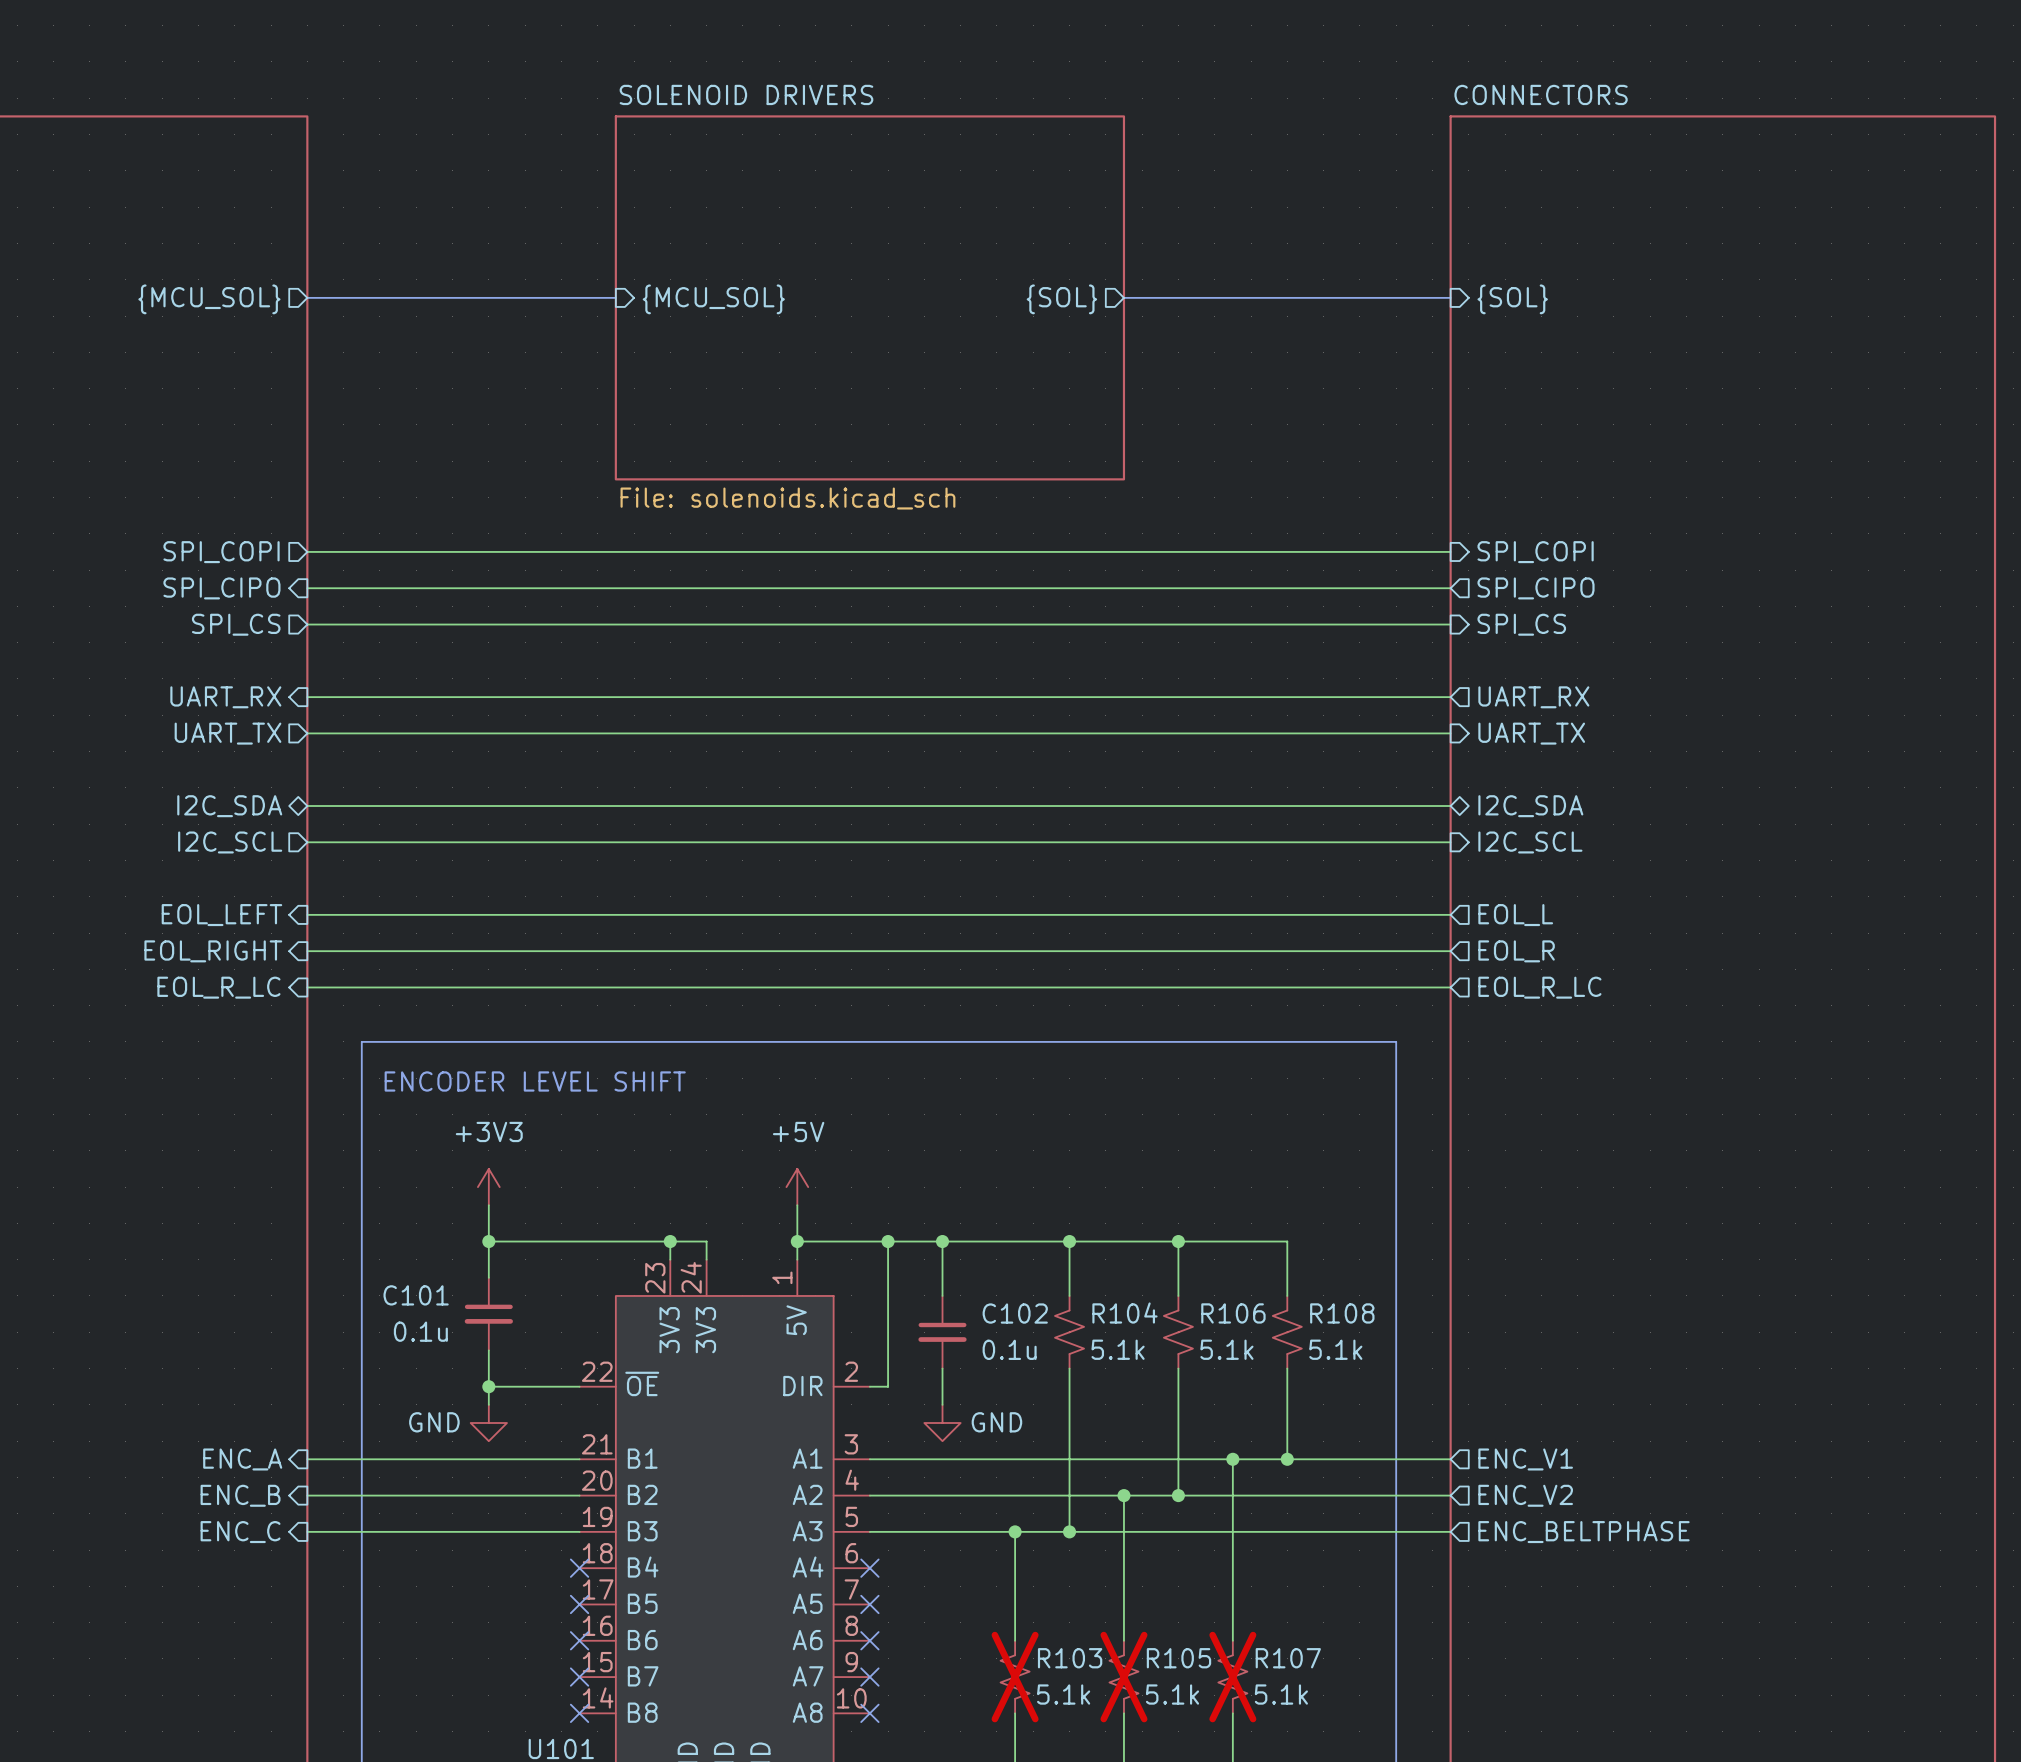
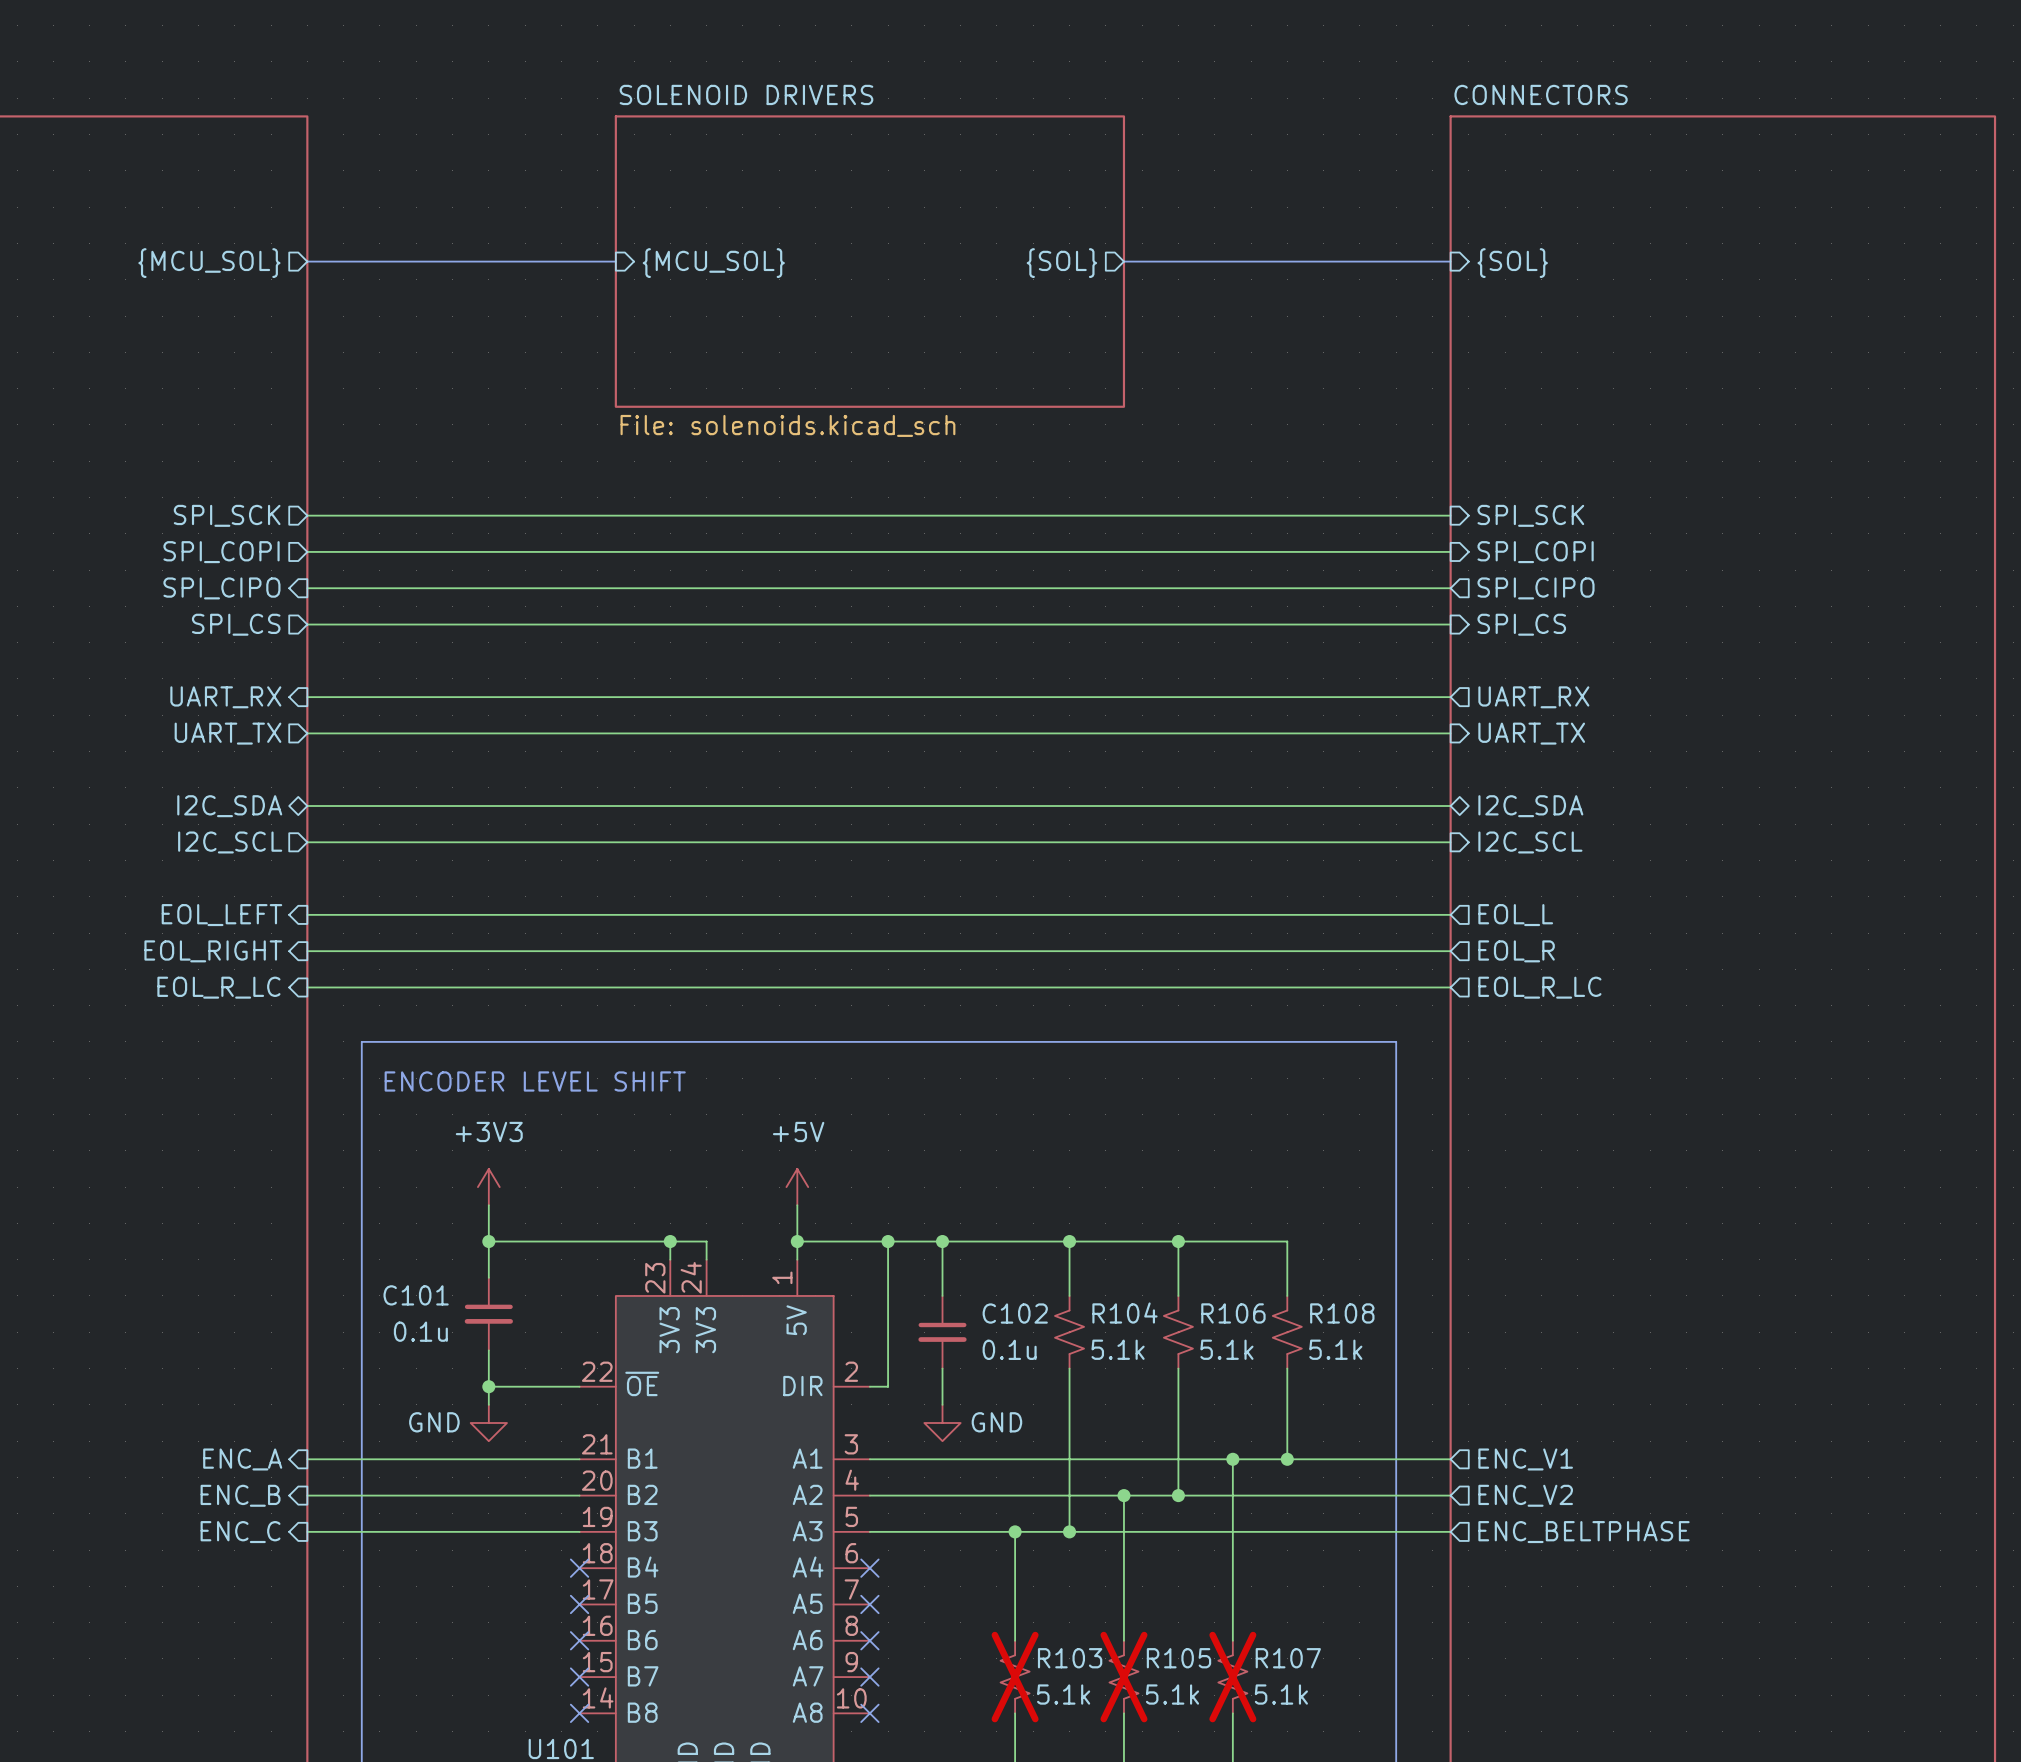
sheet SOLENOID DRIVERS: none -> File: solenoids.kicad_sch (869, 261)
bus: (307, 297) (615, 297) -> (307, 261) (615, 261)
sheet SOLENOID DRIVERS: File: solenoids.kicad_sch (869, 297) -> none
bus: (1123, 297) (1450, 297) -> (1123, 261) (1450, 261)
sheet pin position: {MCU_SOL} (209, 299) -> {MCU_SOL} (209, 263)
sheet pin position: {MCU_SOL} (713, 299) -> {MCU_SOL} (713, 263)
sheet pin position: {SOL} (1061, 299) -> {SOL} (1061, 263)
sheet pin position: {SOL} (1512, 299) -> {SOL} (1512, 263)
sheet pin: none -> SPI_SCK (227, 515)
wire: none -> (307, 515) (1450, 515)
sheet pin: none -> SPI_SCK (1530, 515)

